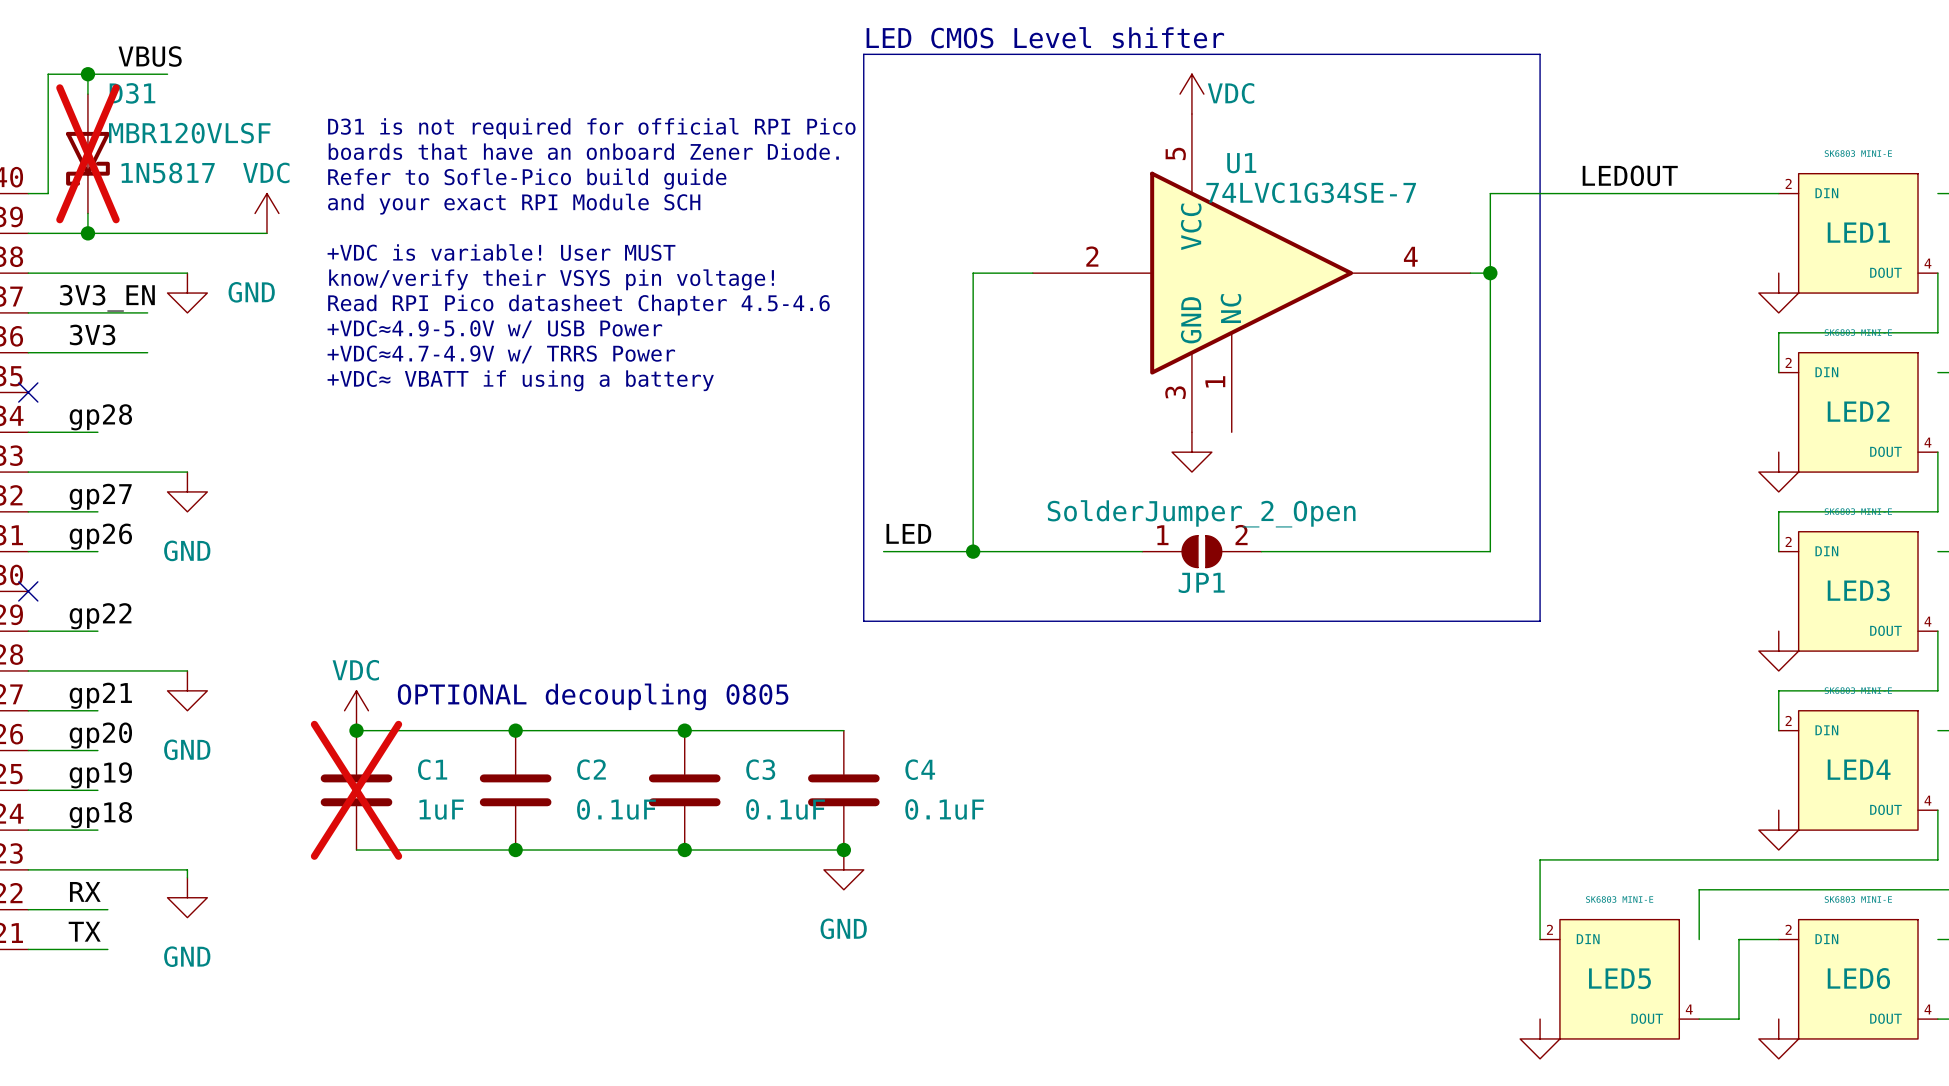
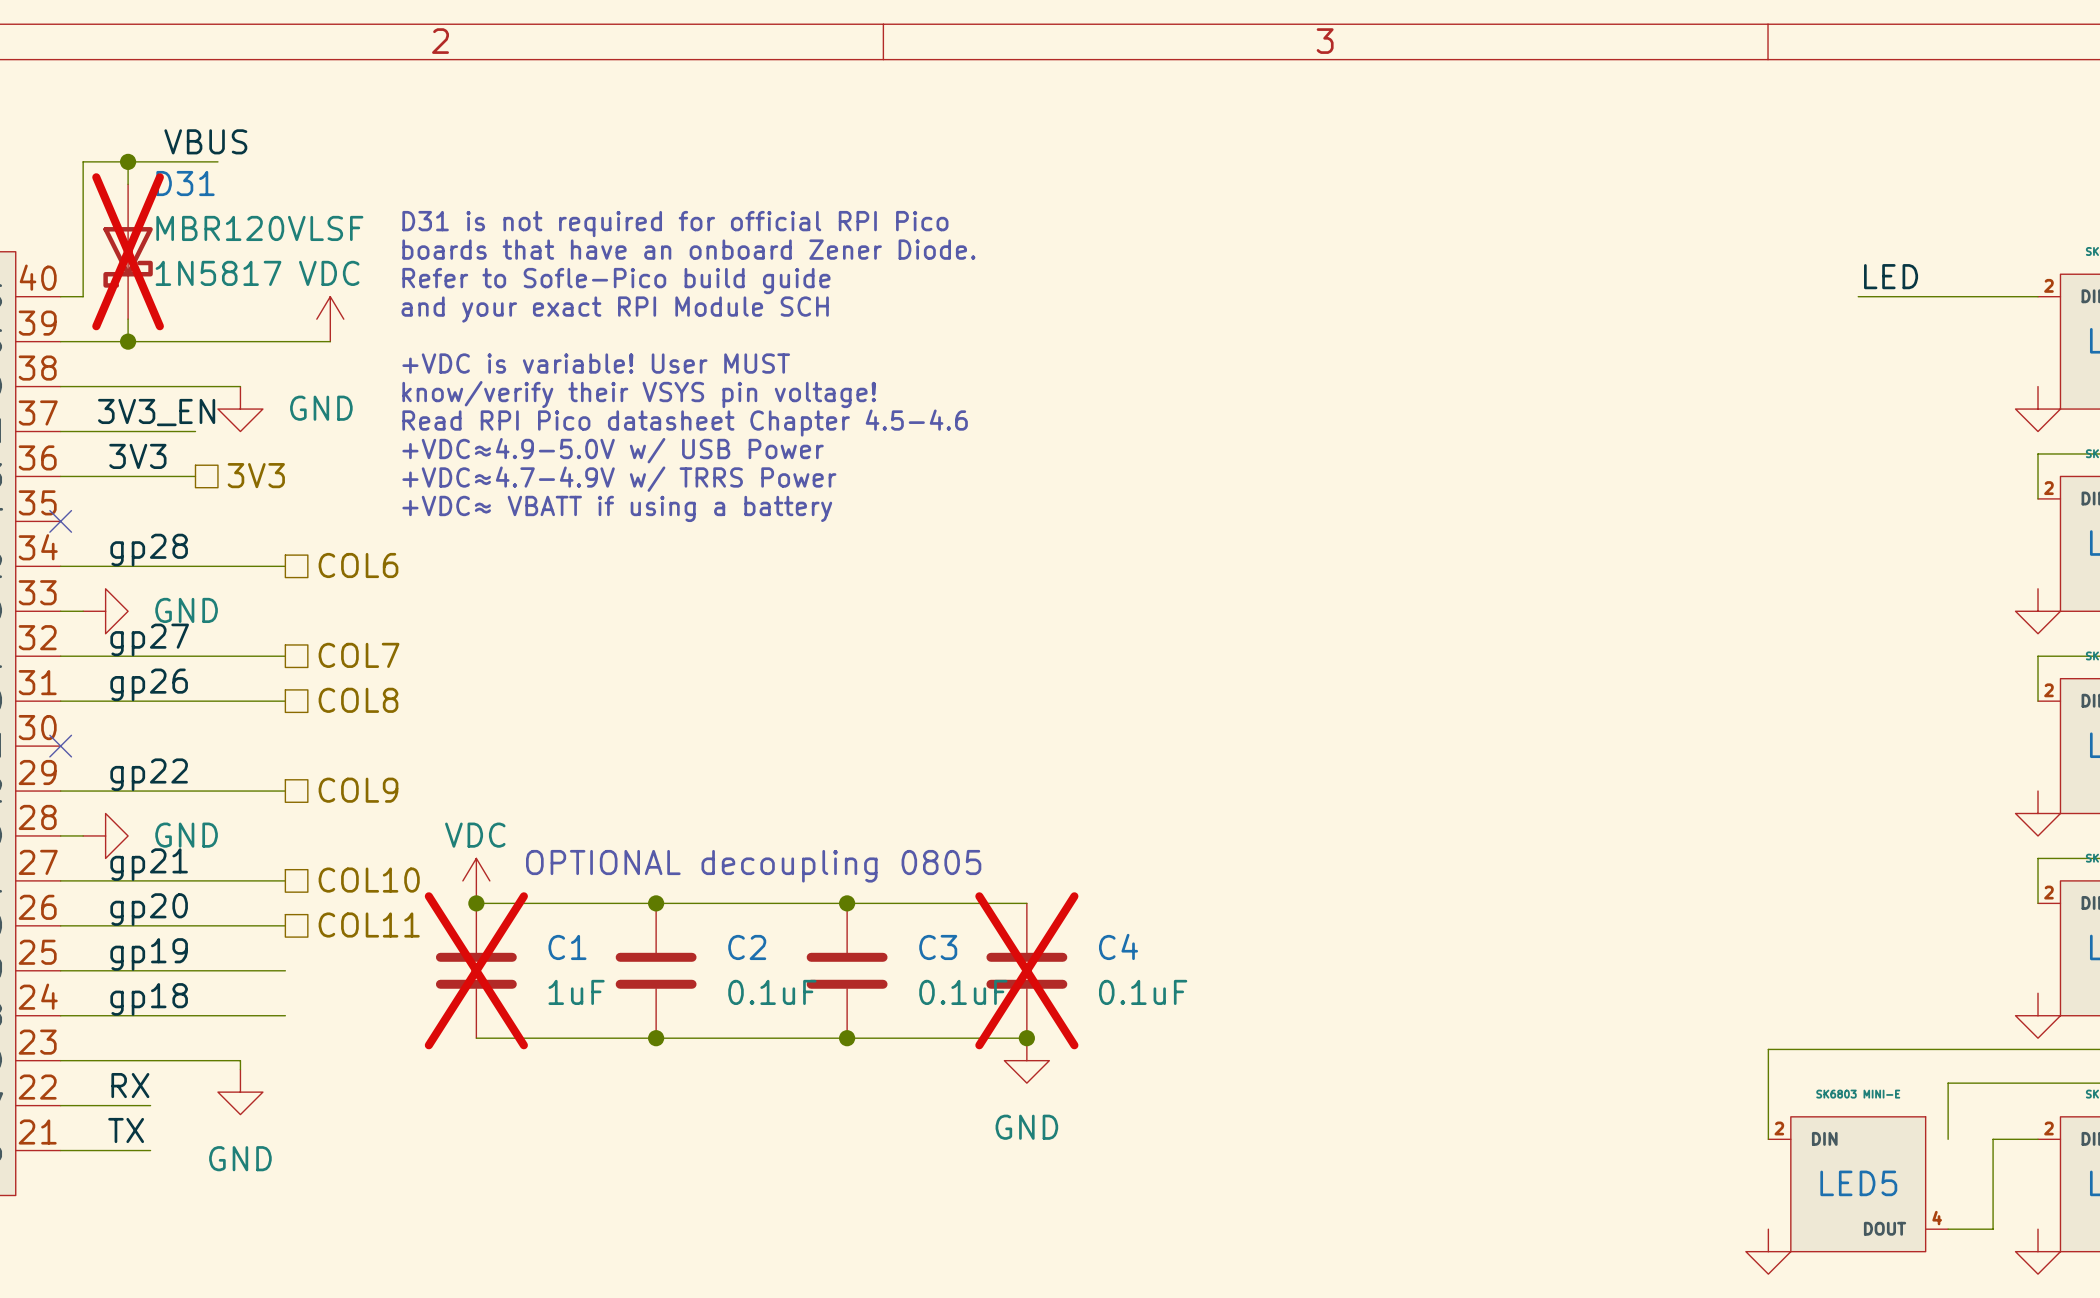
text: LED CMOS Level shifter (1045, 37) -> none
line: (863, 54) (1540, 54) (1540, 621) (863, 621) (863, 54) -> none
power symbol: VDC (1191, 94) -> none
label: LEDOUT (1630, 175) -> LED (1891, 276)
wire: (1619, 193) (1490, 193) (1490, 551) (1261, 551) -> none
wire: (1032, 273) (973, 273) (973, 551) -> none
U1: 74LVC1G34SE-7 (1251, 273) -> none
wire: (1470, 273) (1490, 273) -> none
junction: (1490, 273) -> none
hierarchical label: none -> 3V3 (256, 475)
hierarchical label: none -> COL6 (358, 565)
wire: none -> (139, 566) (285, 566)
power symbol: (1191, 452) -> none
wire: (48, 472) (187, 472) -> none
power symbol: none -> GND (105, 611)
power symbol: GND (187, 491) -> none
wire: none -> (139, 656) (285, 656)
hierarchical label: none -> COL7 (359, 655)
label: LED (908, 533) -> none
hierarchical label: none -> COL8 (358, 700)
wire: none -> (139, 701) (285, 701)
wire: (883, 551) (1142, 551) -> none
junction: (973, 551) -> none
JP1: SolderJumper_2_Open (1201, 551) -> none
hierarchical label: none -> COL9 (358, 790)
wire: none -> (139, 791) (285, 791)
wire: (48, 670) (187, 670) -> none
power symbol: none -> GND (105, 835)
power symbol: GND (187, 690) -> none
text position: OPTIONAL decoupling 0805 (593, 696) -> OPTIONAL decoupling 0805 (753, 866)
wire: none -> (139, 880) (285, 880)
hierarchical label: none -> COL10 (369, 880)
power symbol position: VDC (356, 710) -> VDC (476, 880)
wire: (356, 730) (396, 730) -> none
junction position: (356, 730) -> (476, 903)
junction position: (515, 730) -> (656, 903)
junction position: (684, 730) -> (847, 903)
wire: none -> (981, 903) (1026, 903)
hierarchical label: none -> COL11 (369, 925)
wire: none -> (139, 925) (285, 925)
wire: none -> (139, 970) (285, 970)
C1 position: (356, 790) -> (476, 970)
C2 position: (515, 790) -> (656, 970)
C3 position: (684, 790) -> (847, 970)
C4 position: (843, 790) -> (1026, 970)
C4 do-not-place cross: none -> (1026, 970)
wire: none -> (139, 1015) (285, 1015)
wire: (356, 850) (396, 850) -> none
junction position: (515, 850) -> (656, 1038)
junction position: (684, 850) -> (847, 1038)
wire: none -> (981, 1038) (1026, 1038)
junction position: (843, 850) -> (1026, 1038)
power symbol position: GND (843, 869) -> GND (1026, 1060)

